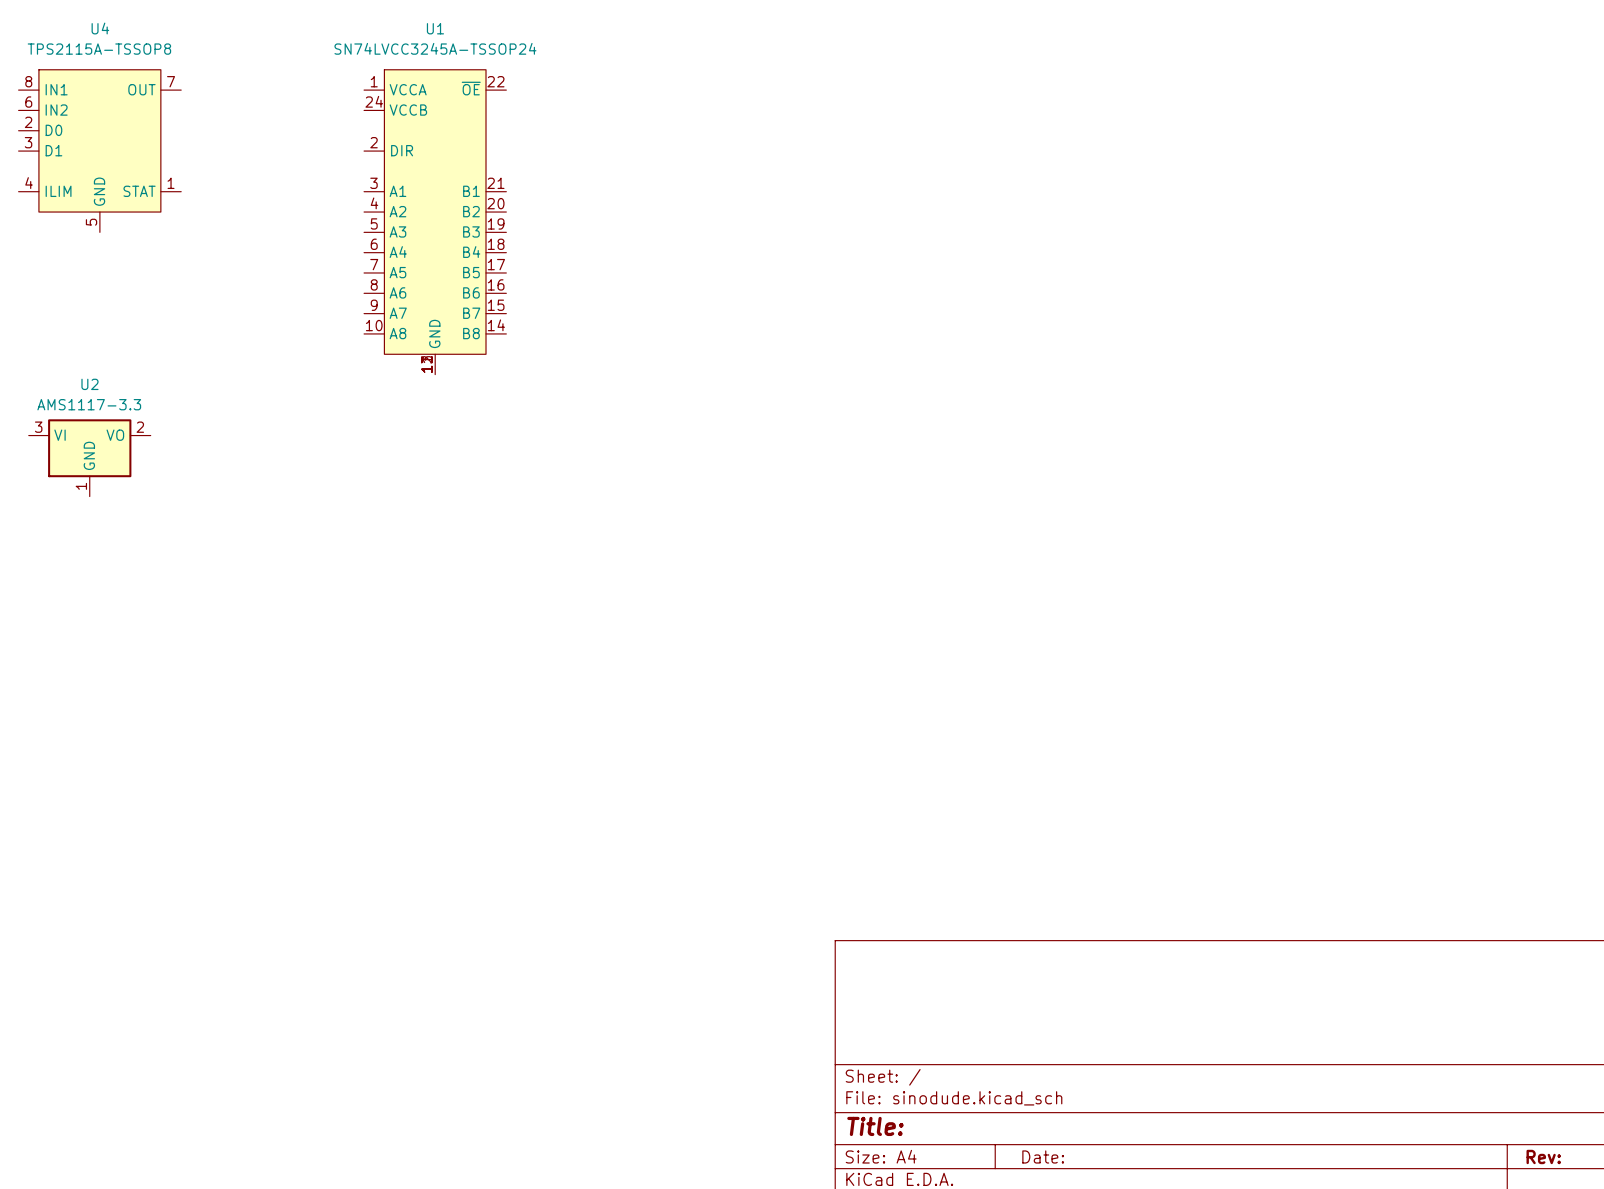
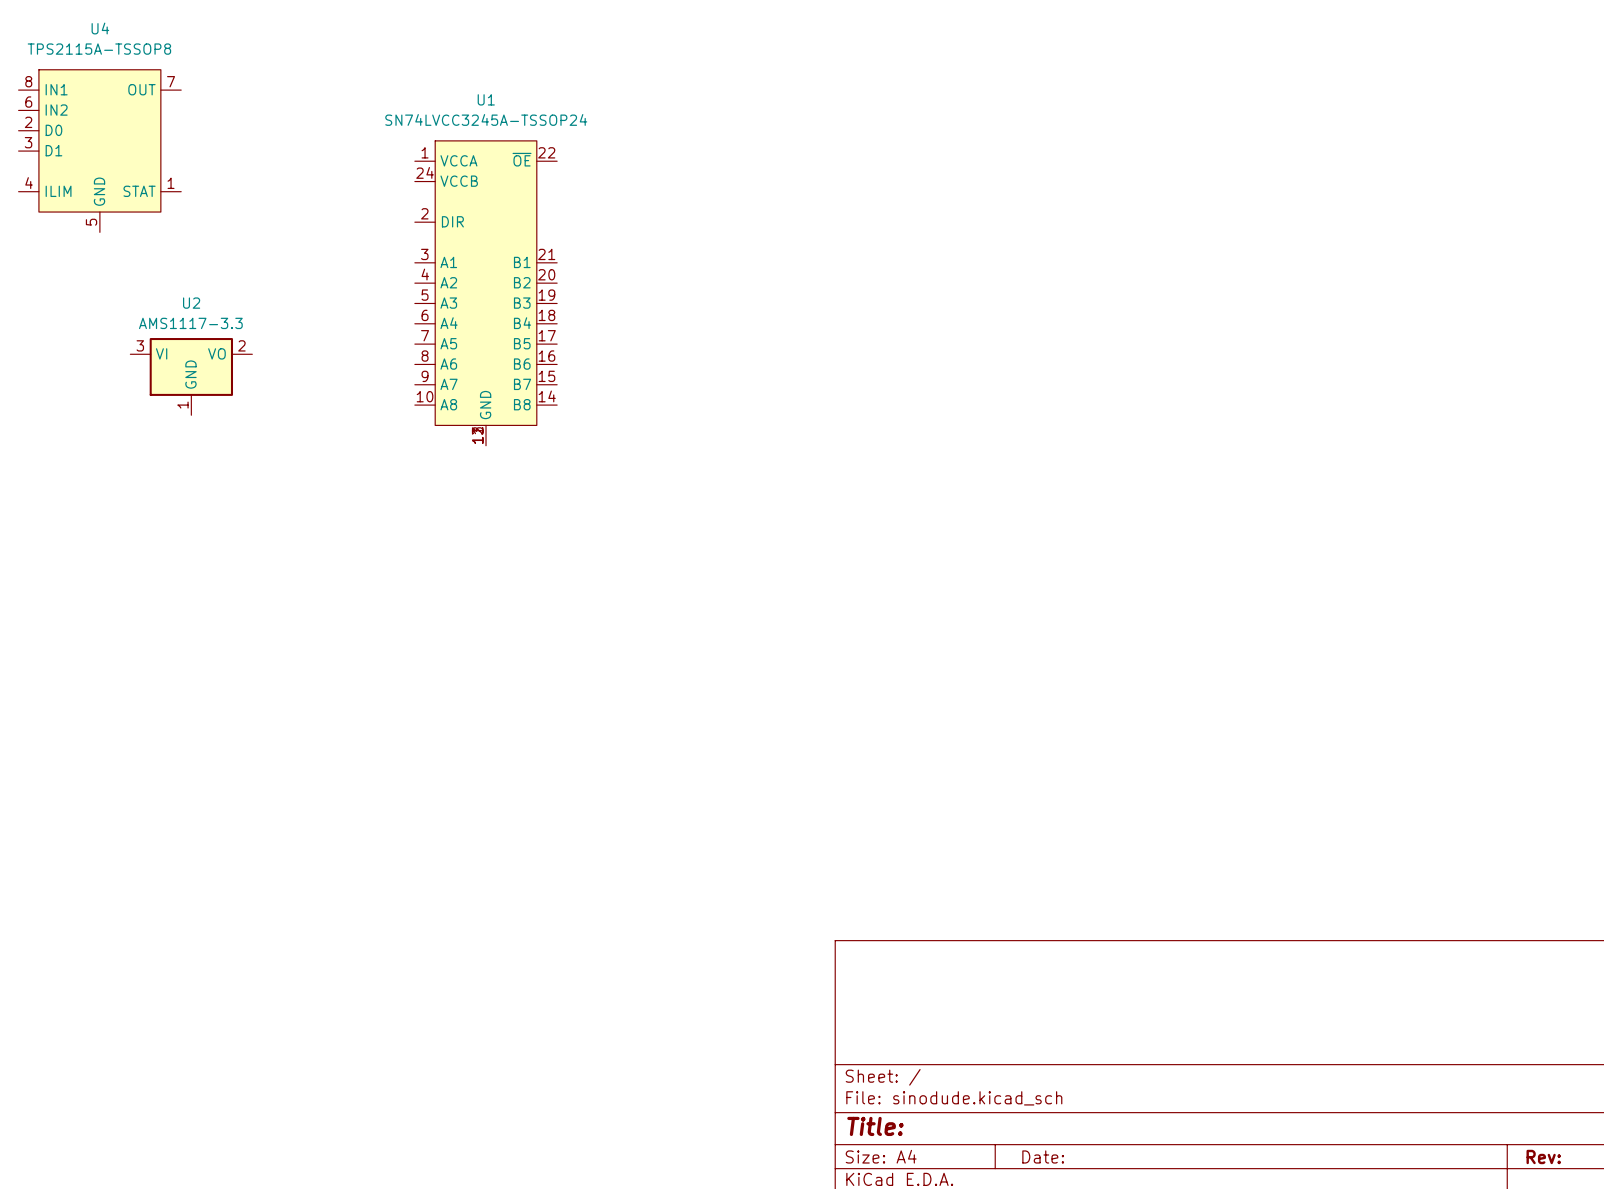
U1 position: (435, 222) -> (486, 293)
U2 position: (89, 457) -> (191, 376)

